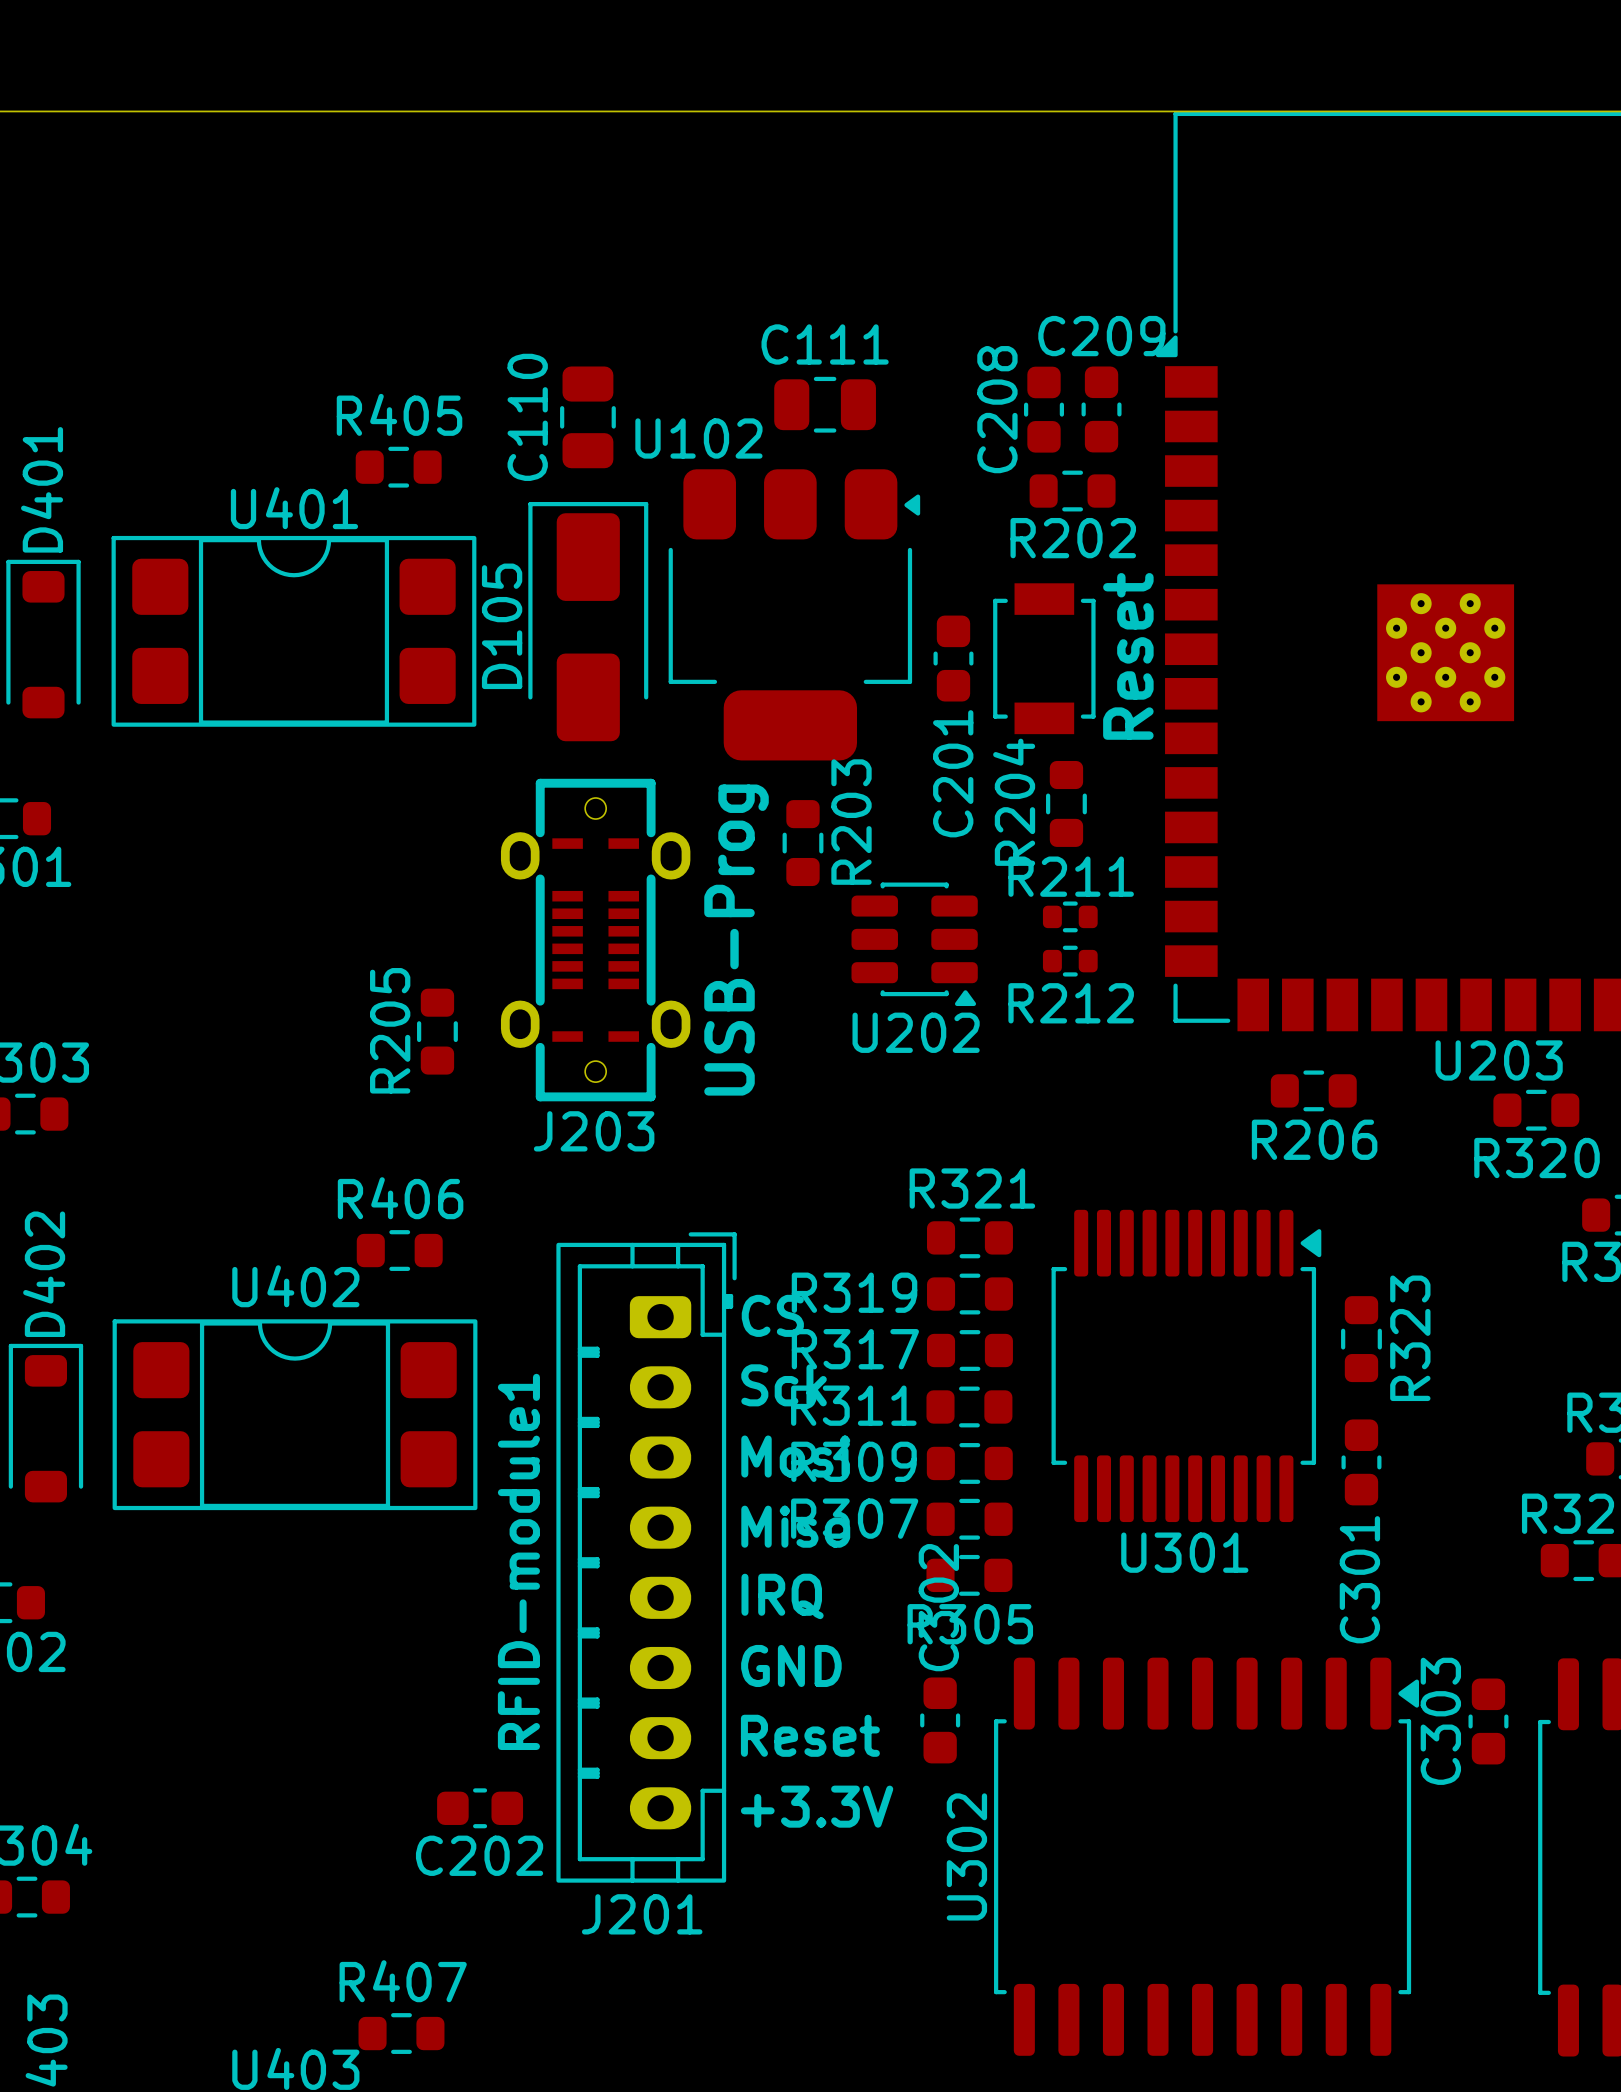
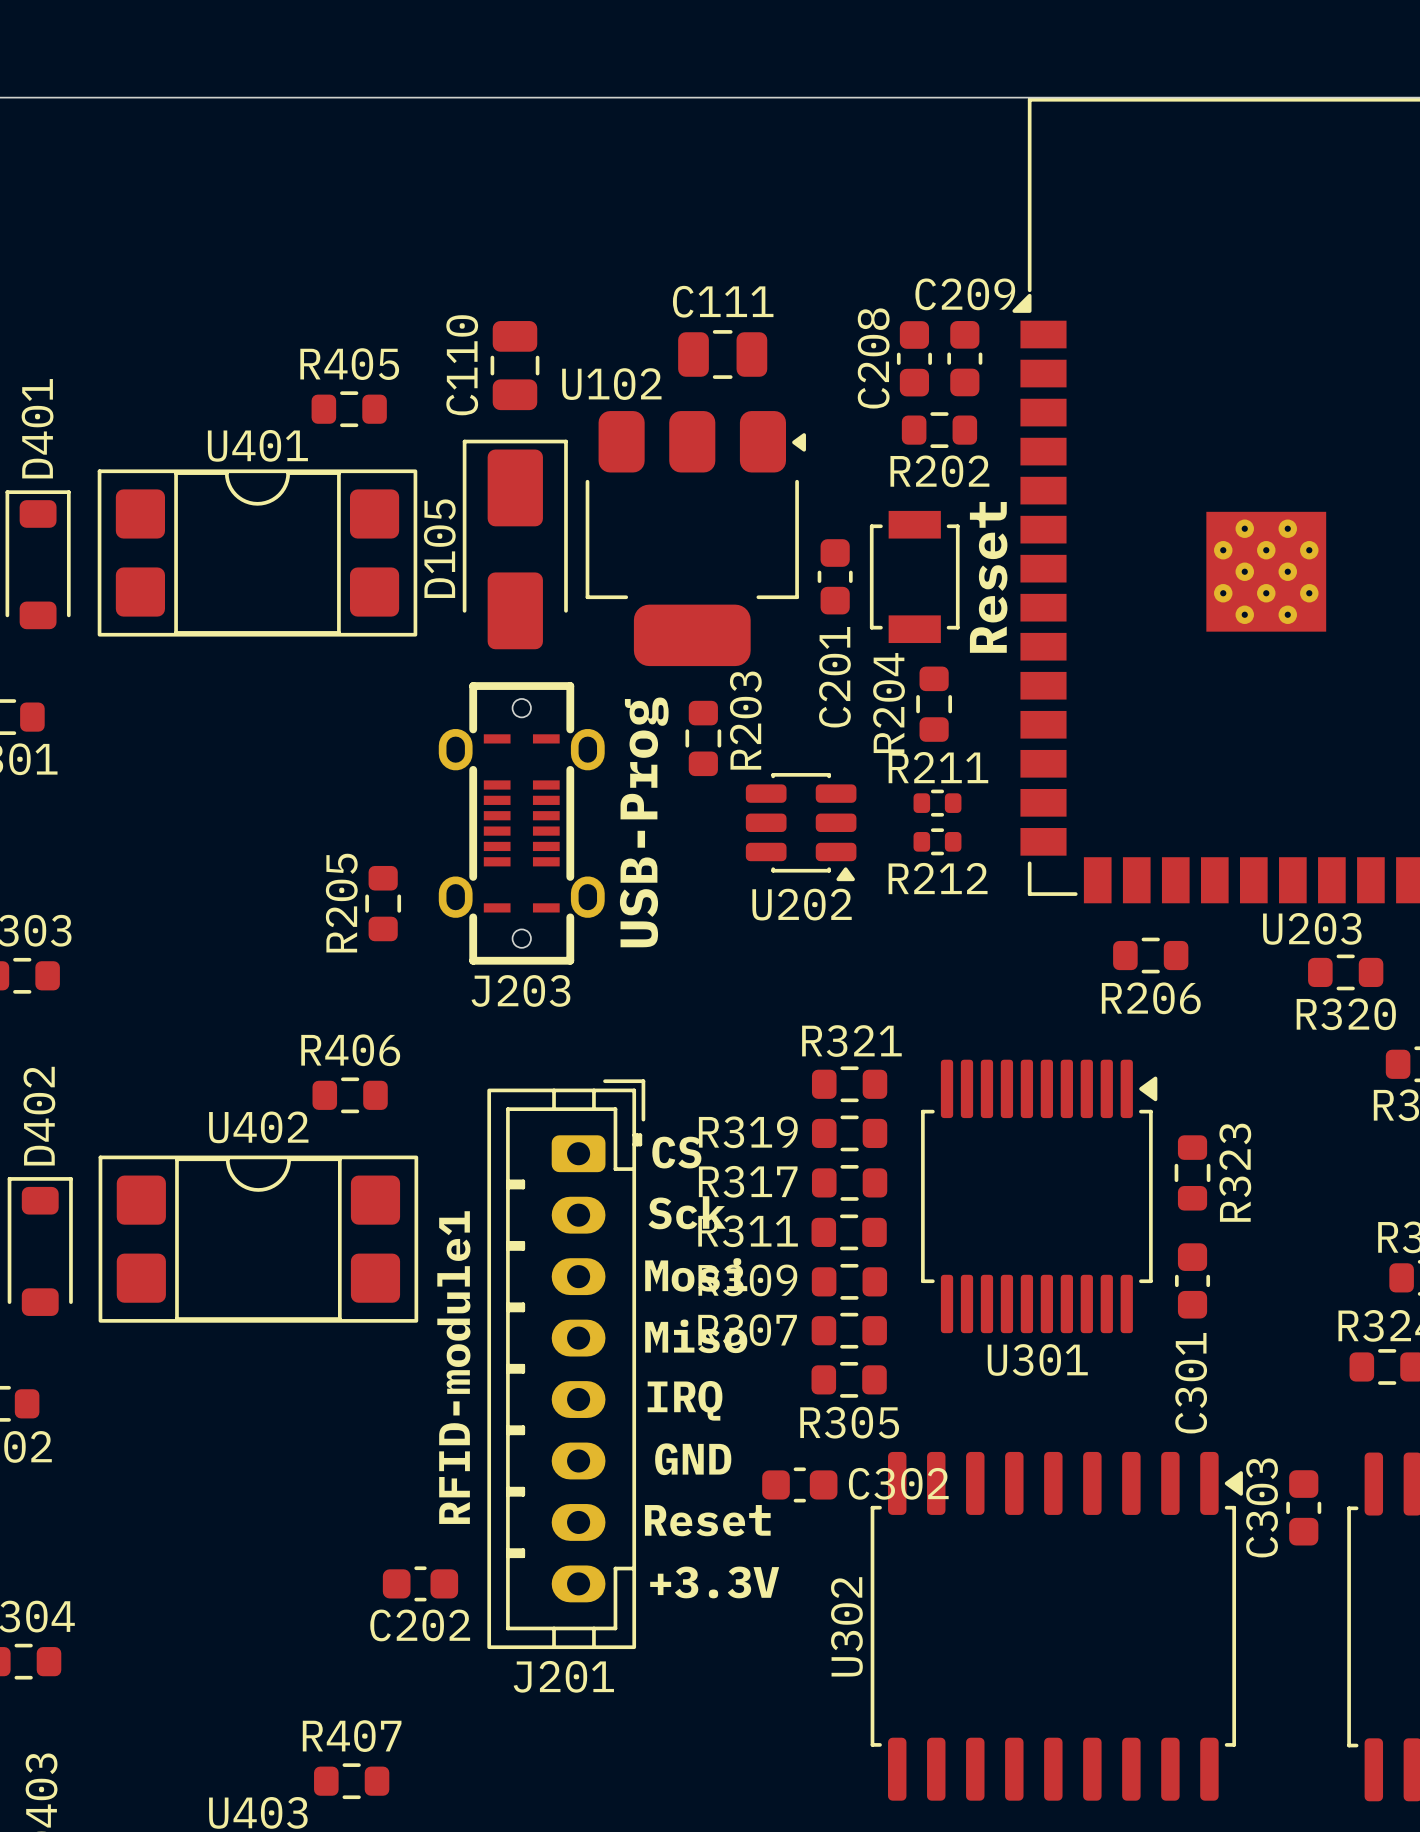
C302 rotation: 0° (940, 1720) -> 90° clockwise (799, 1484)

